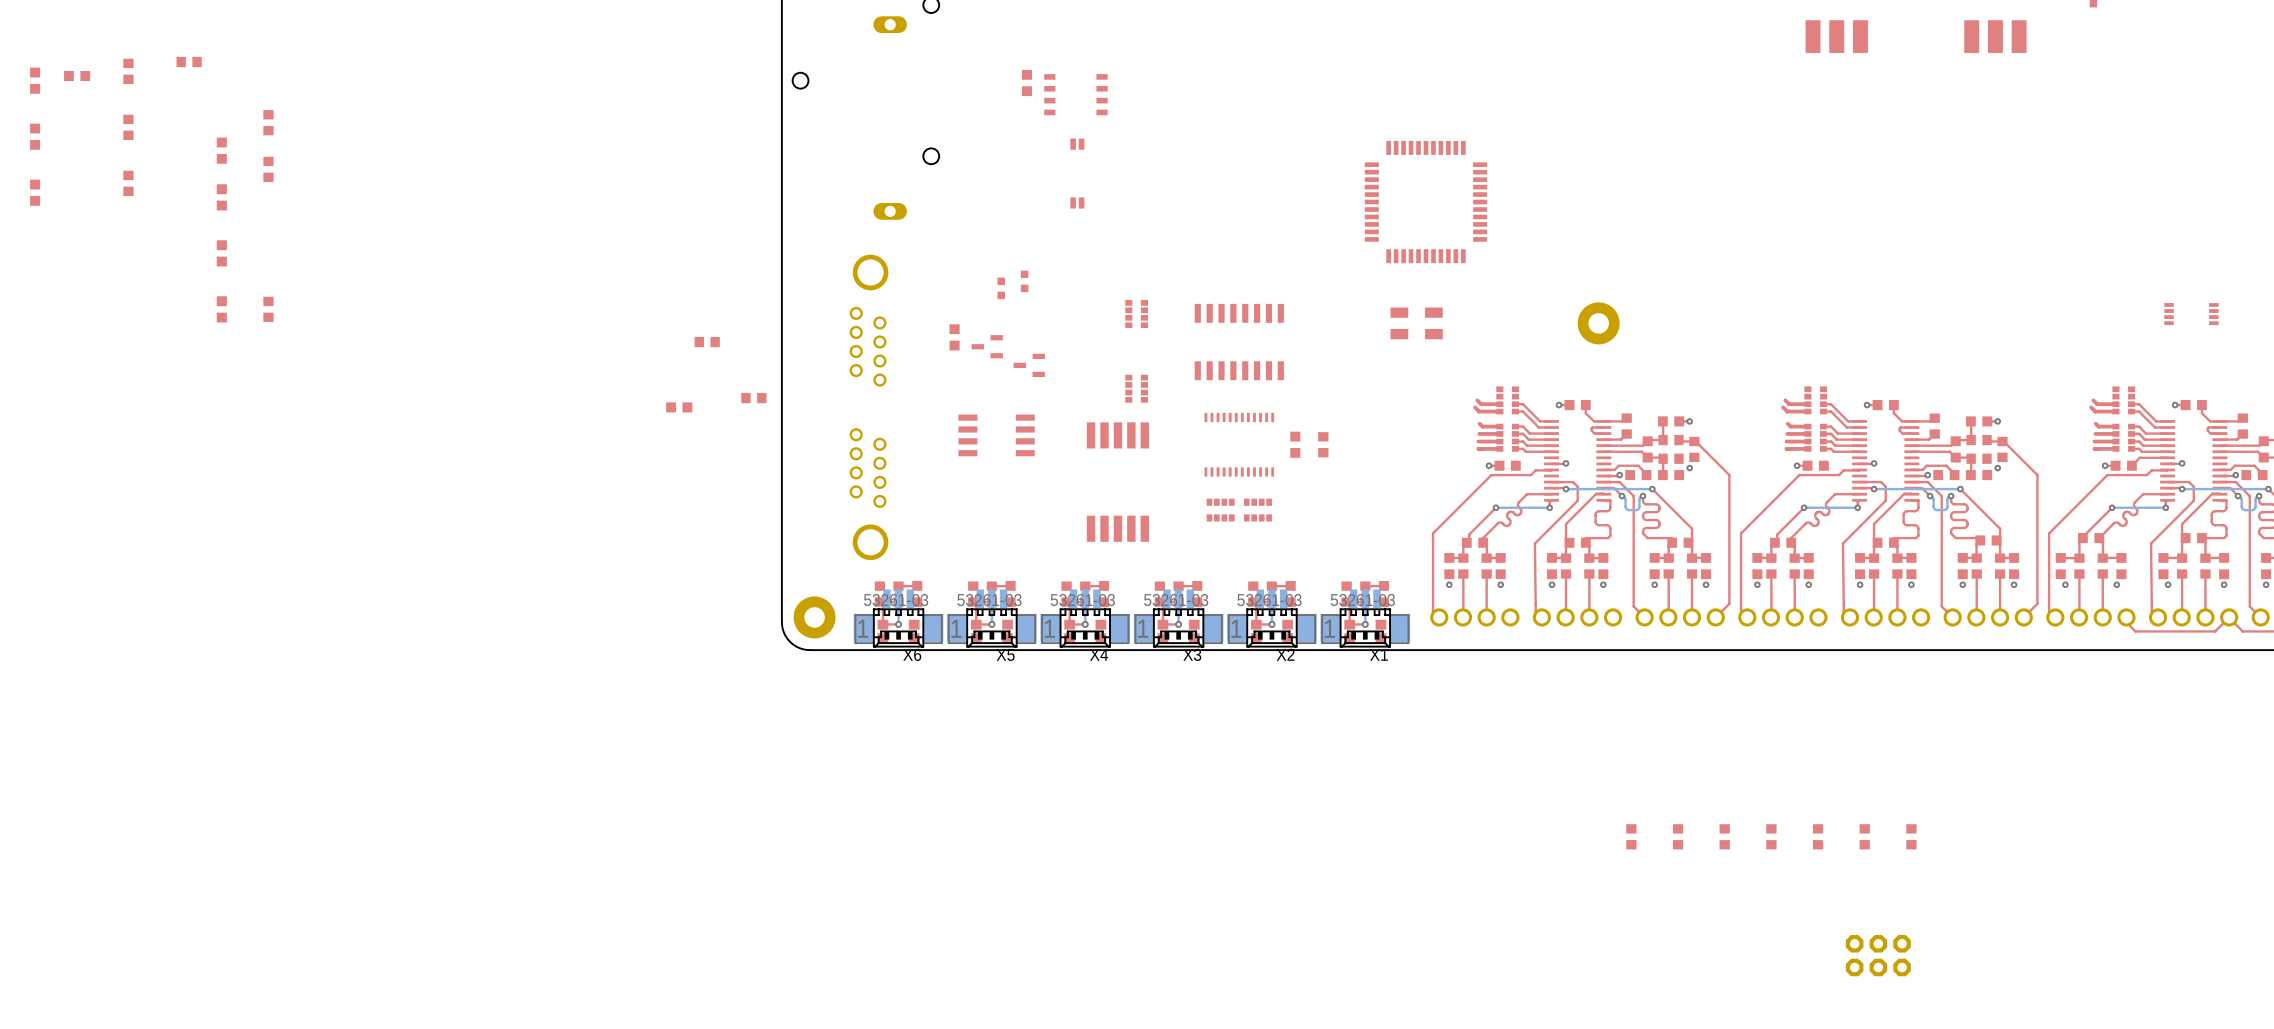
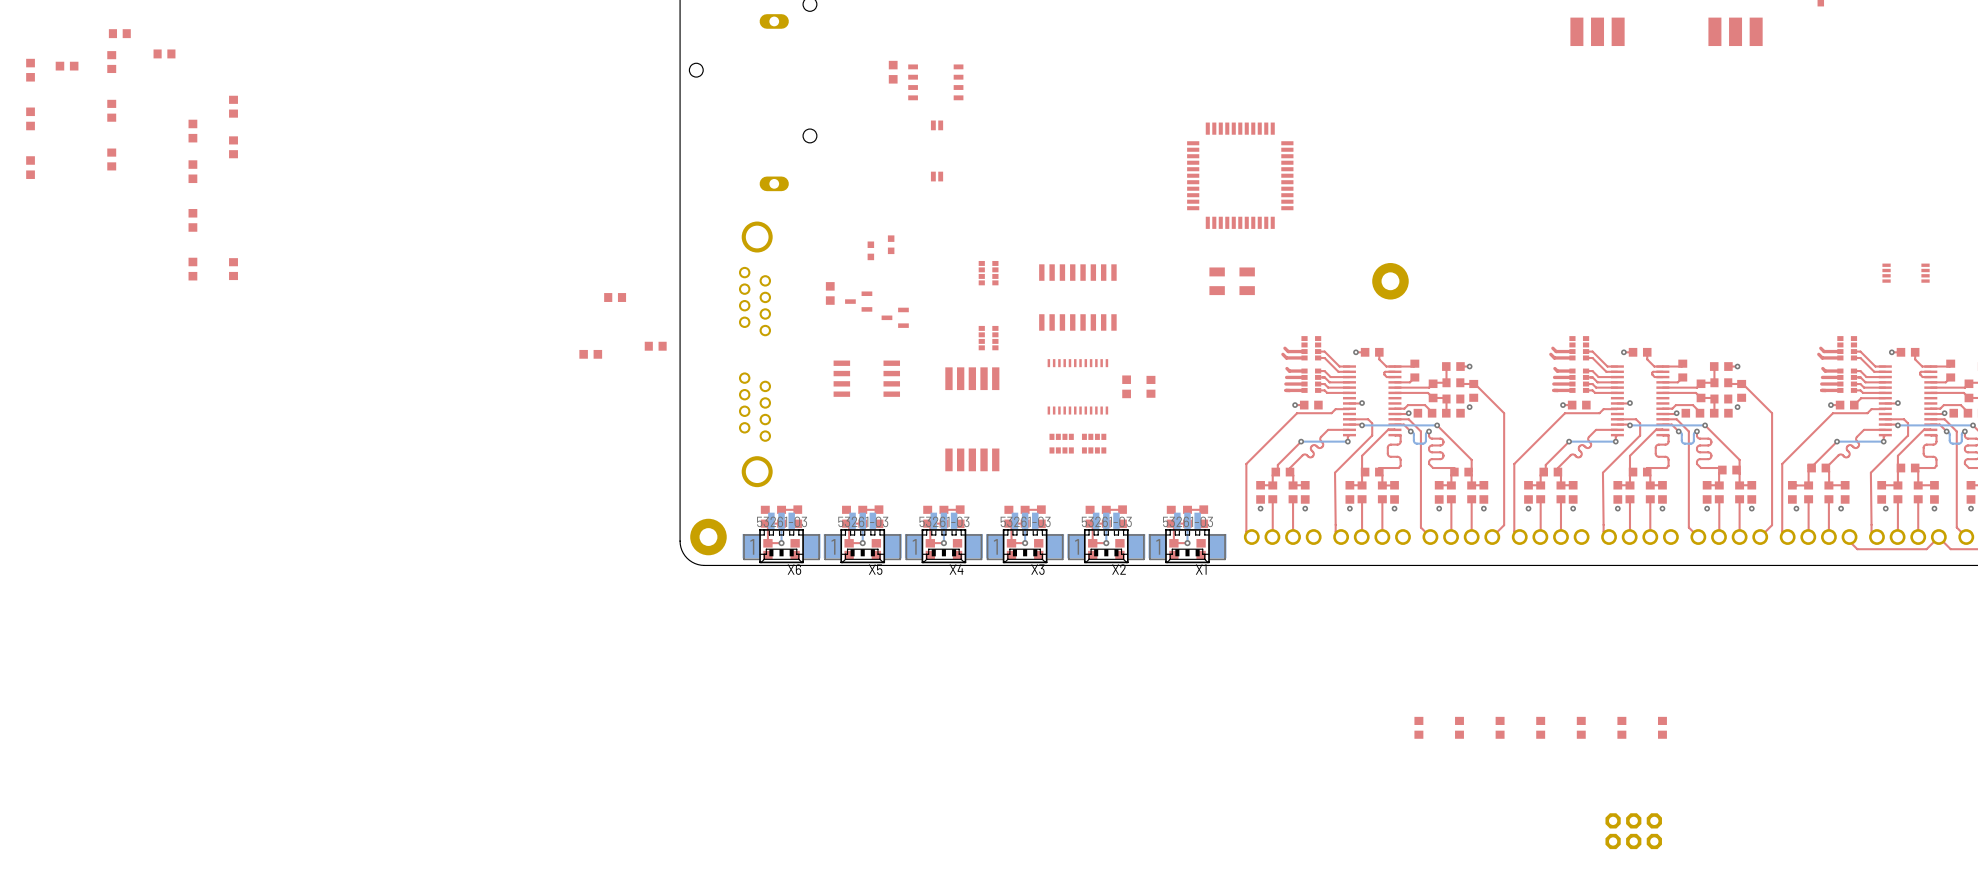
part: none -> (119, 33)

